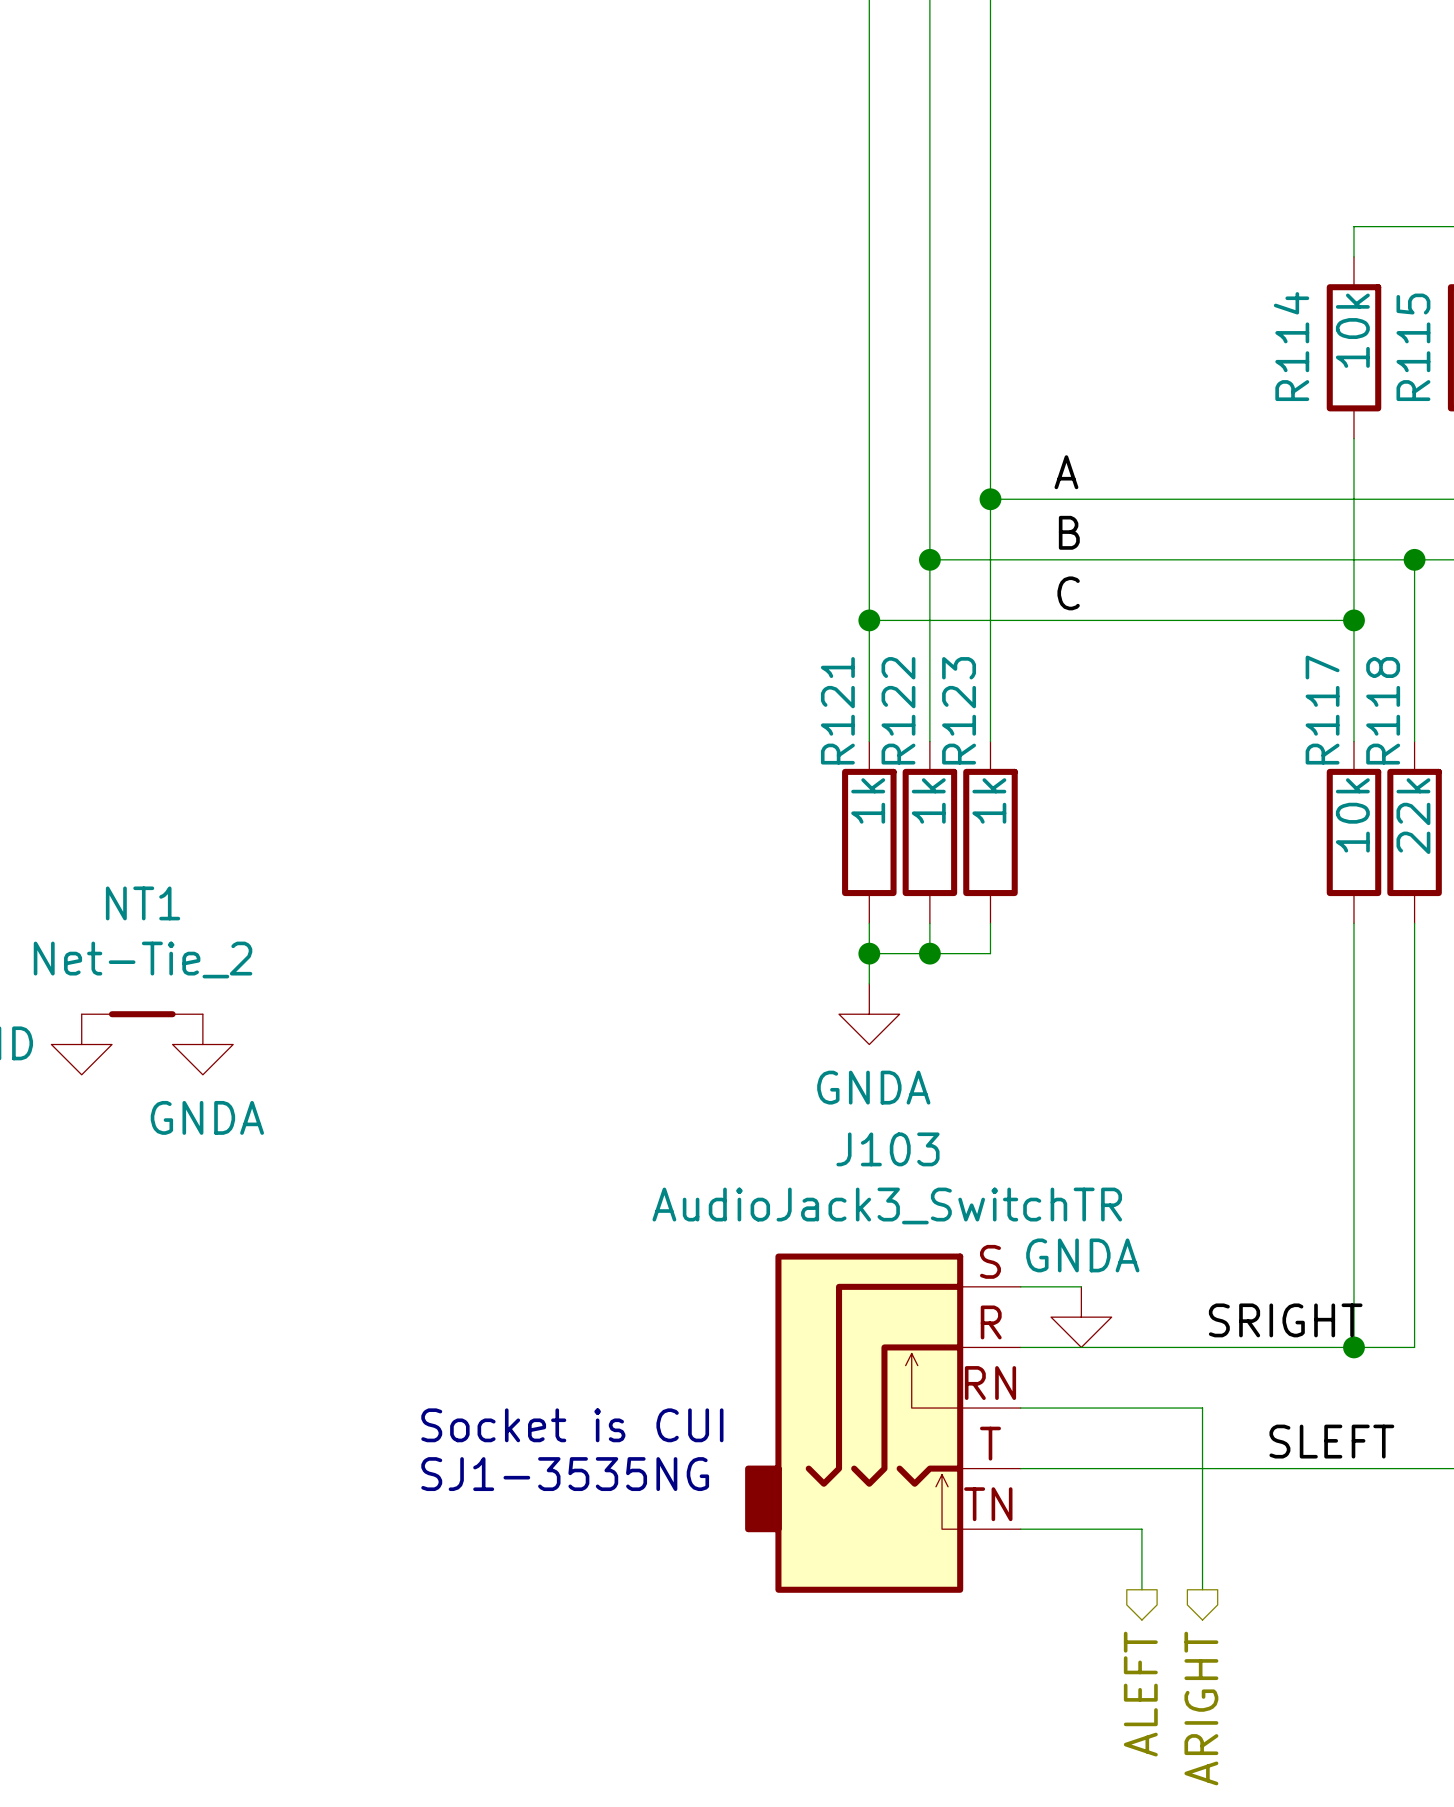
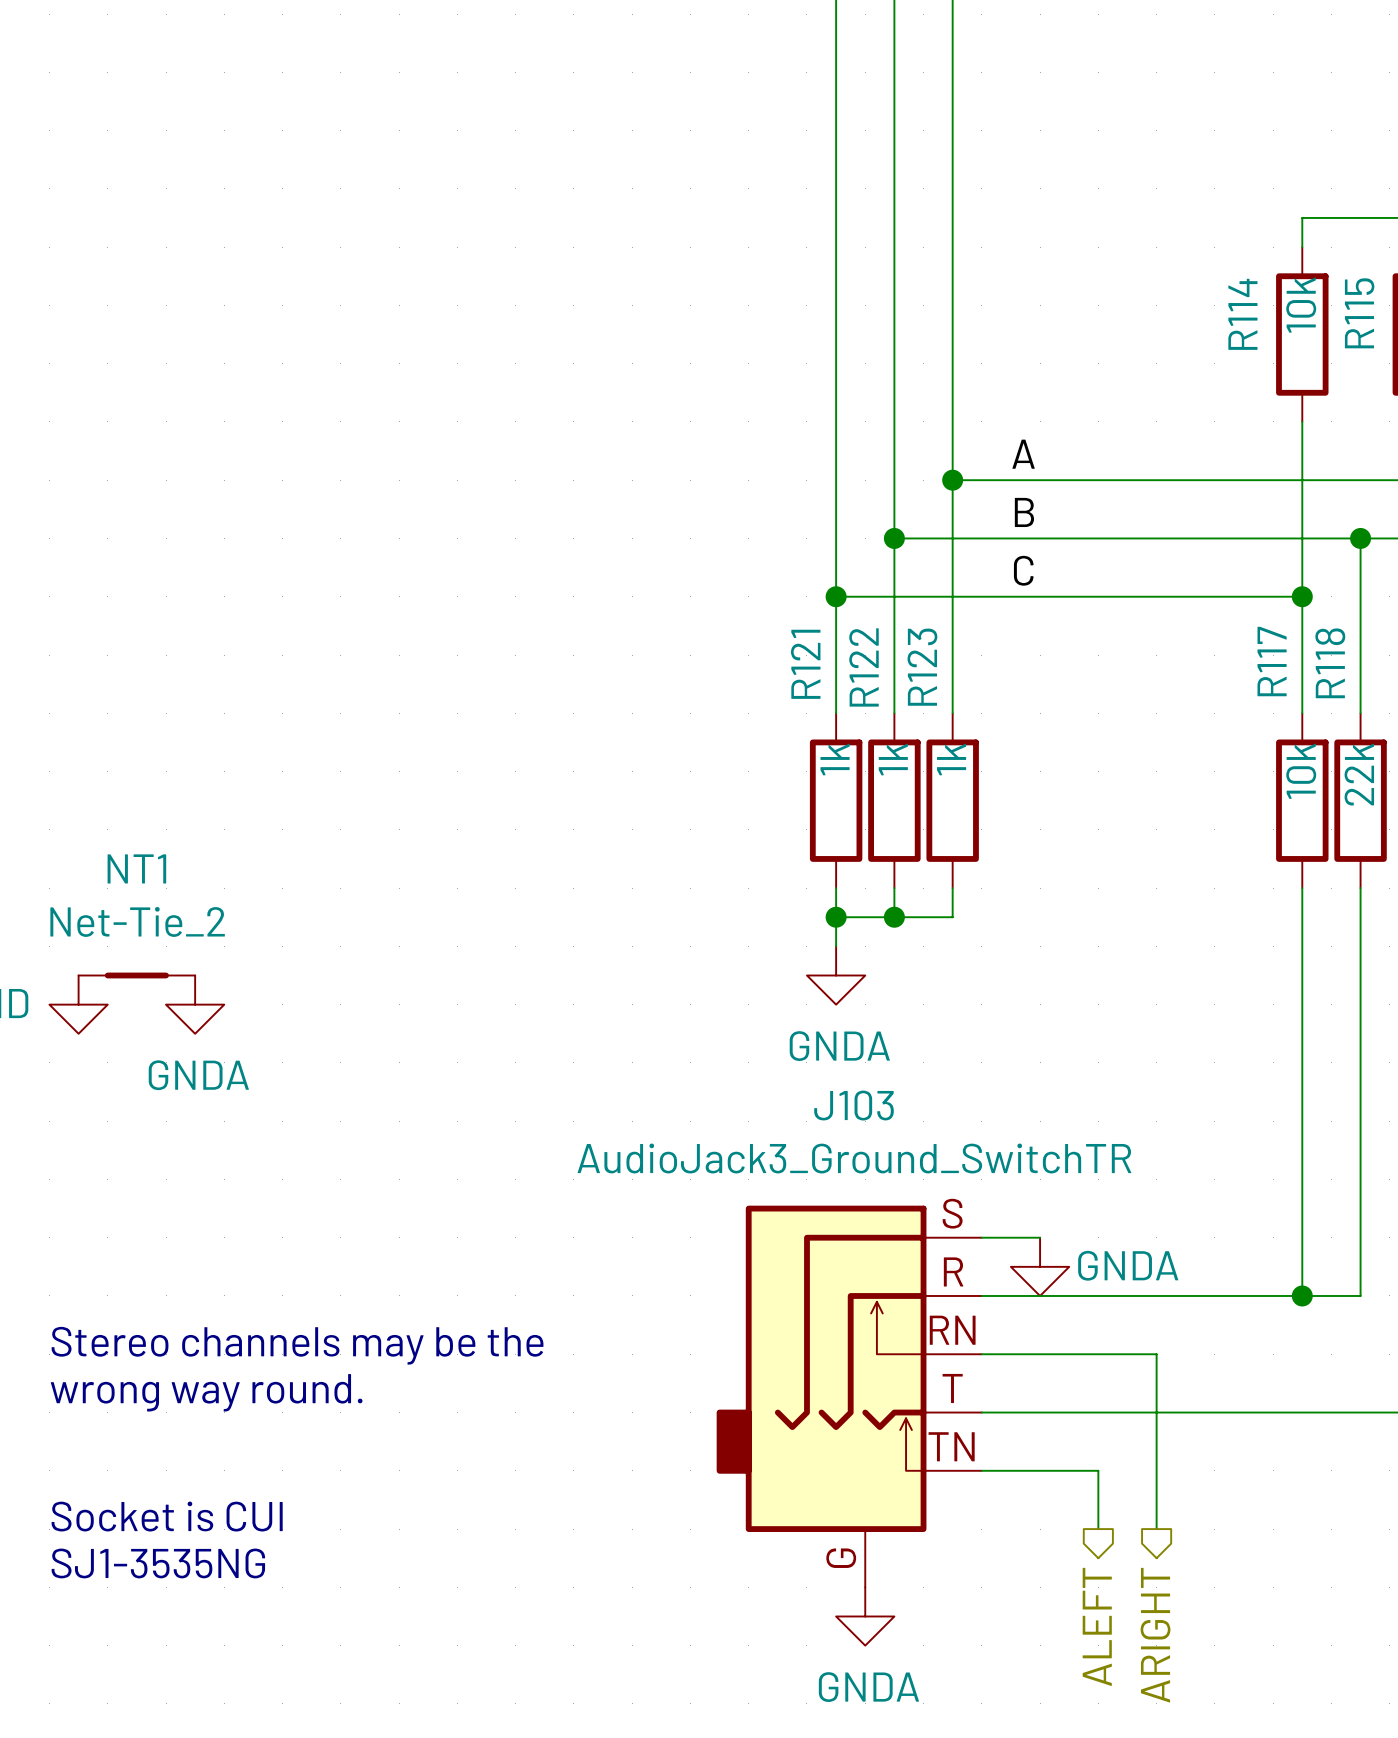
J103 value: AudioJack3_SwitchTR (887, 1205) -> AudioJack3_Ground_SwitchTR (854, 1158)
J103 symbol: [745, 1253, 1021, 1593] -> [716, 1205, 982, 1588]
power symbol text position: GNDA (1082, 1255) -> GNDA (1128, 1265)
label: SRIGHT (1285, 1320) -> none
text: none -> Stereo channels may be the (297, 1345)
text position: Socket is CUI (572, 1425) -> Socket is CUI (167, 1516)
label: SLEFT (1331, 1441) -> none
text: none -> wrong way round. (206, 1392)
text position: SJ1-3535NG (565, 1474) -> SJ1-3535NG (158, 1563)
power symbol: none -> GNDA (865, 1616)

